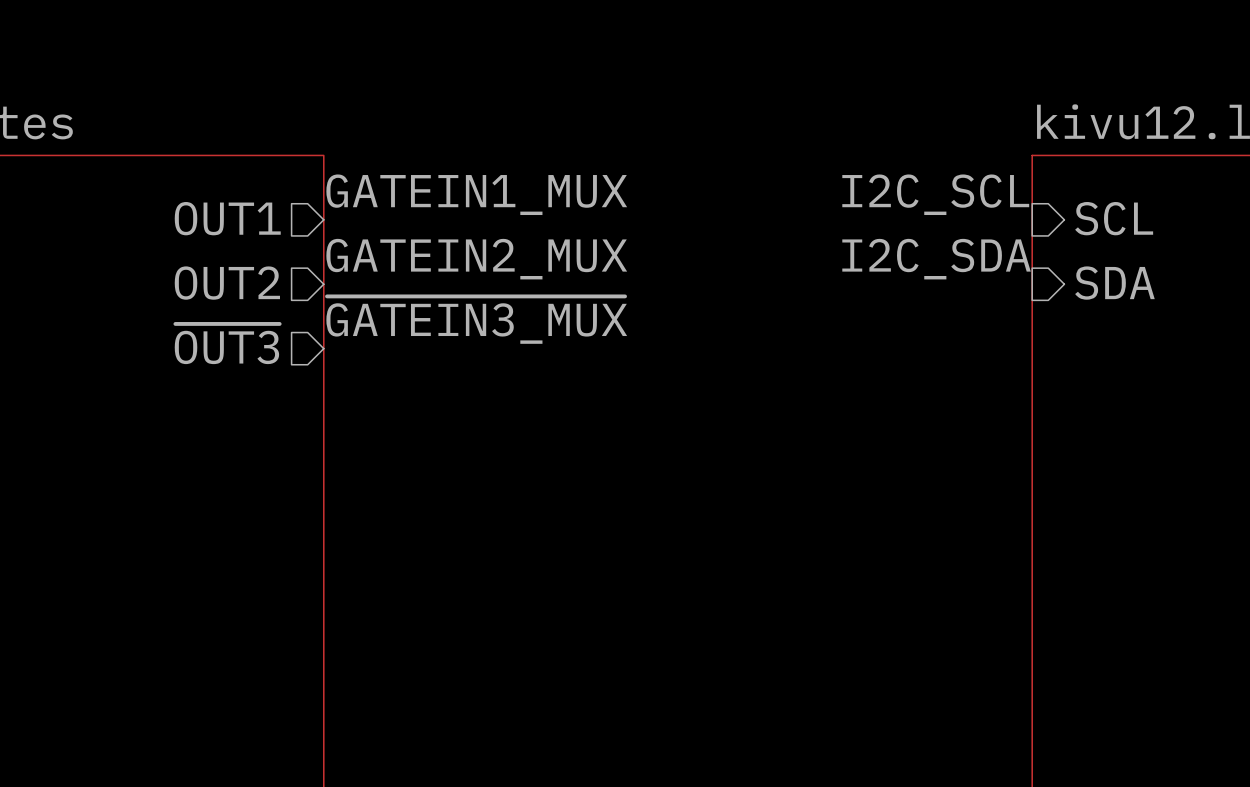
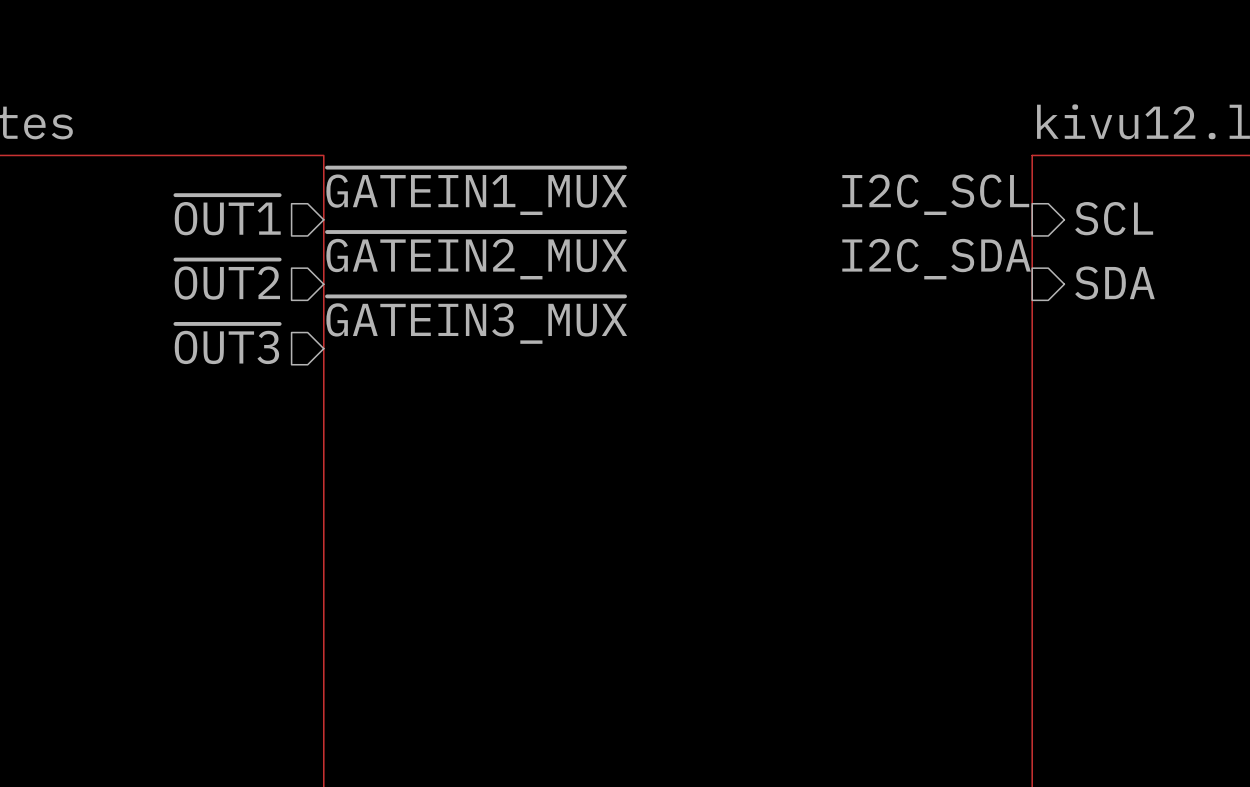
label: GATEIN1_MUX (476, 194) -> ~{GATEIN1_MUX} (476, 191)
sheet pin: OUT1 (227, 218) -> ~{OUT1} (227, 215)
label: GATEIN2_MUX (476, 259) -> ~{GATEIN2_MUX} (476, 255)
sheet pin: OUT2 (227, 283) -> ~{OUT2} (227, 279)

